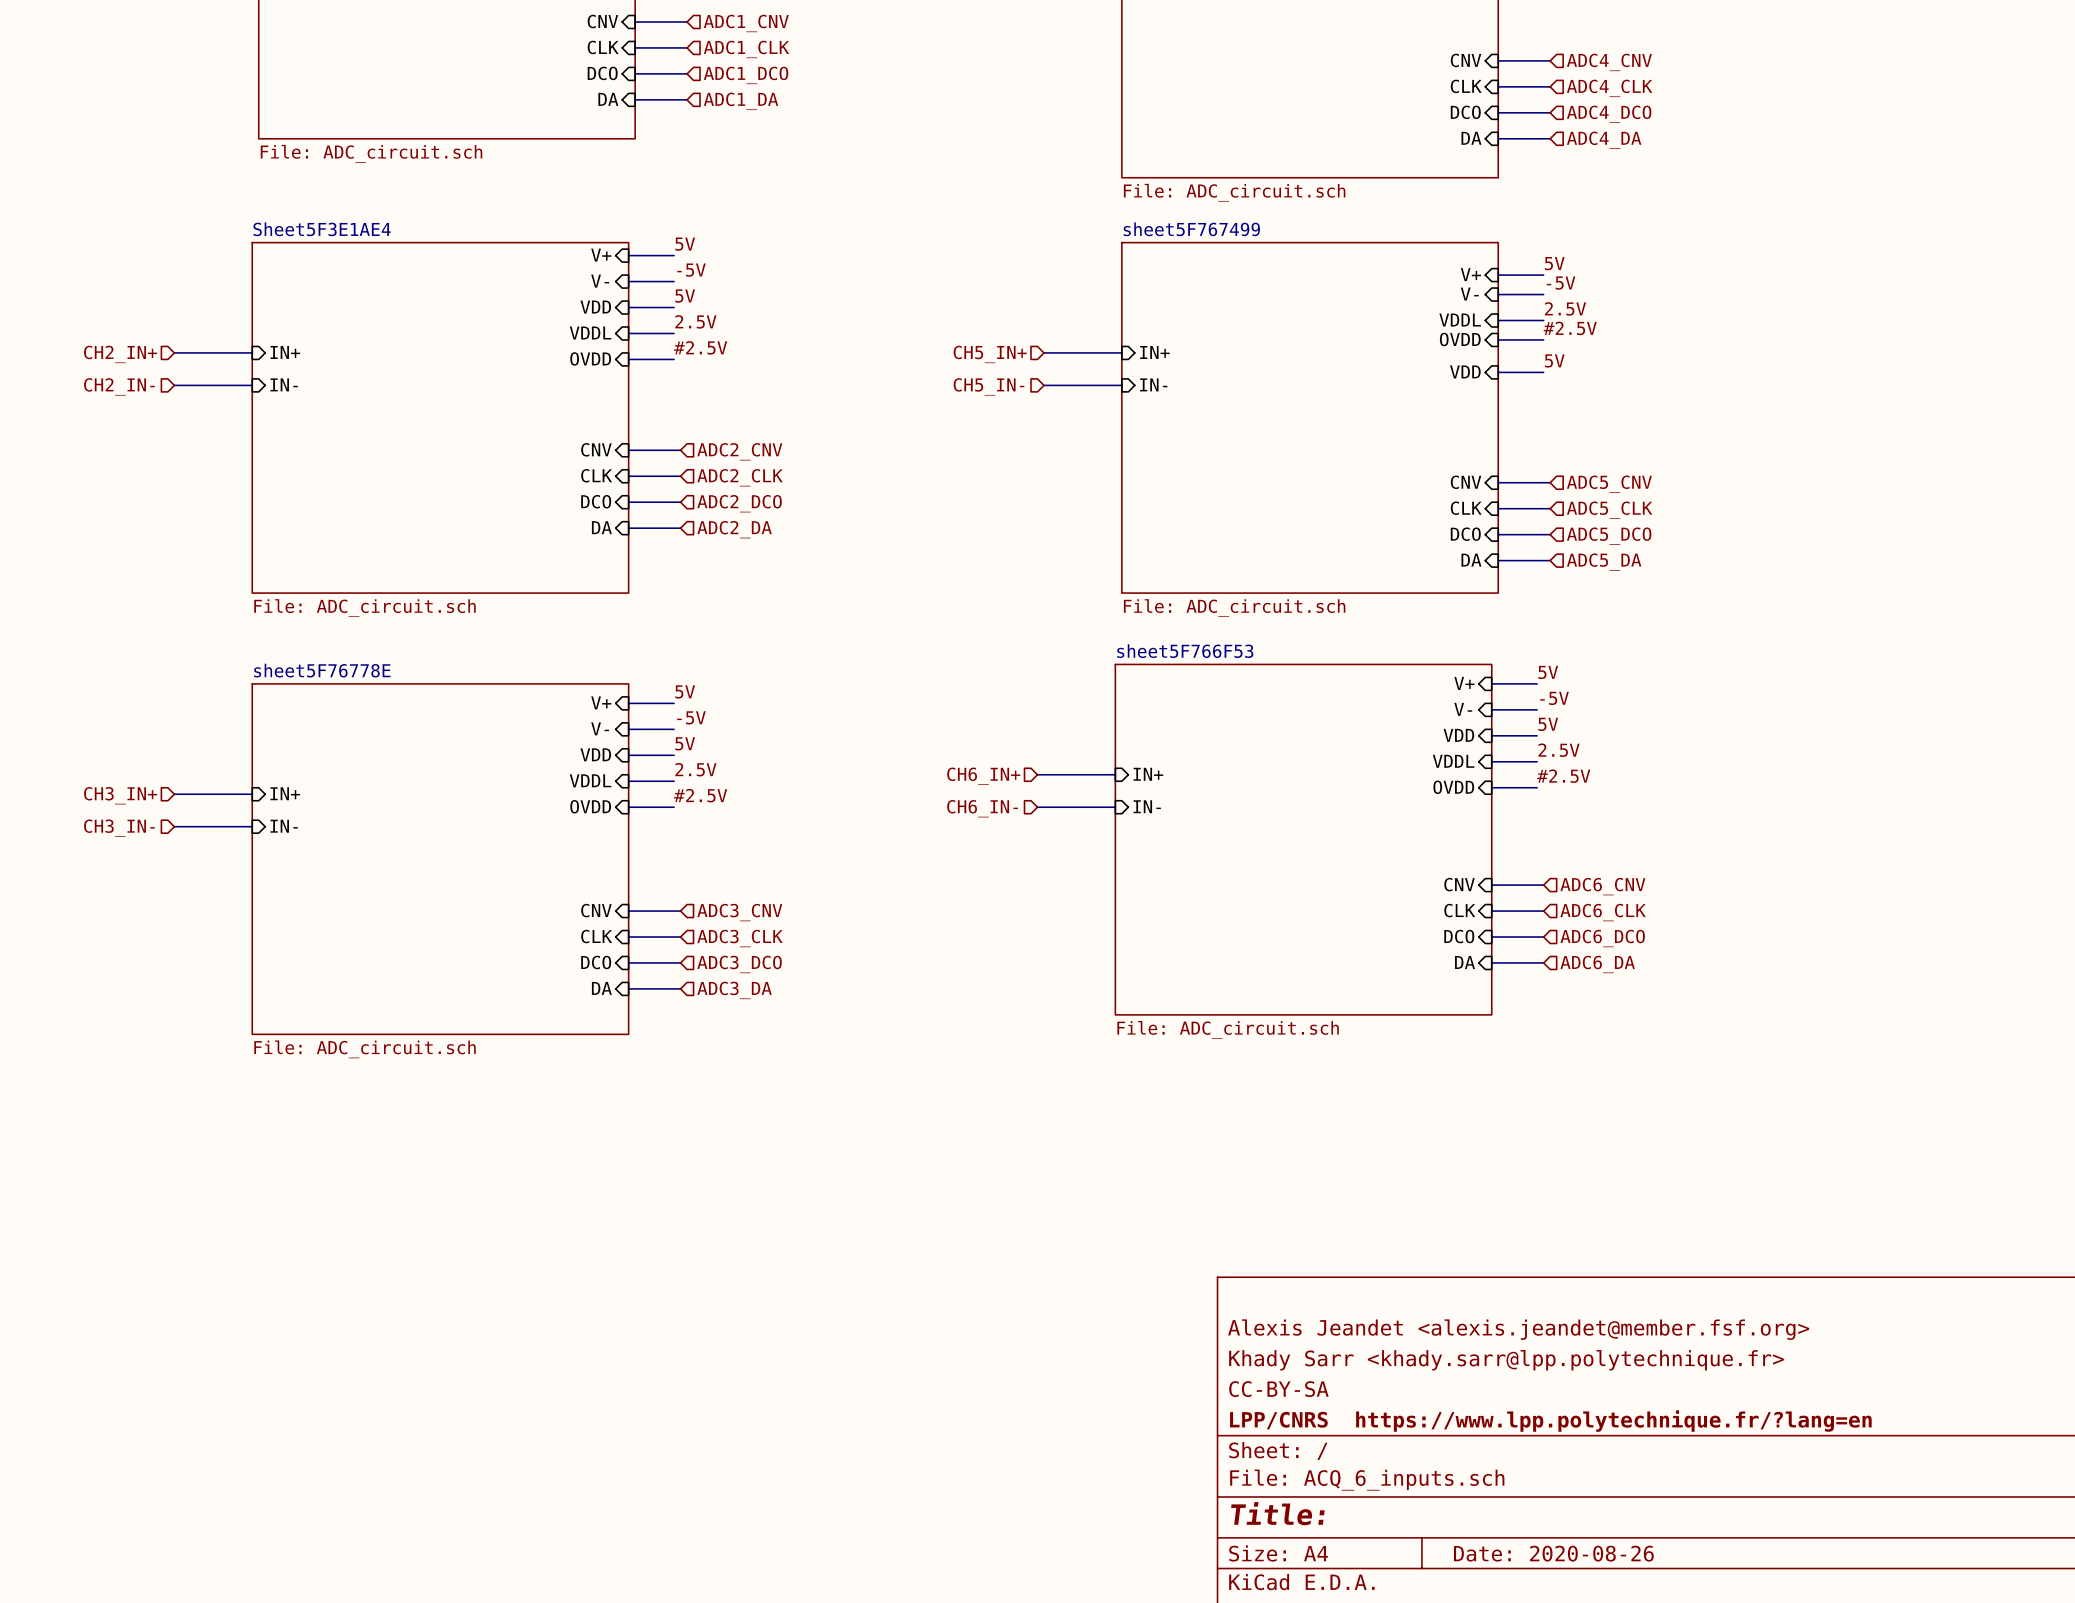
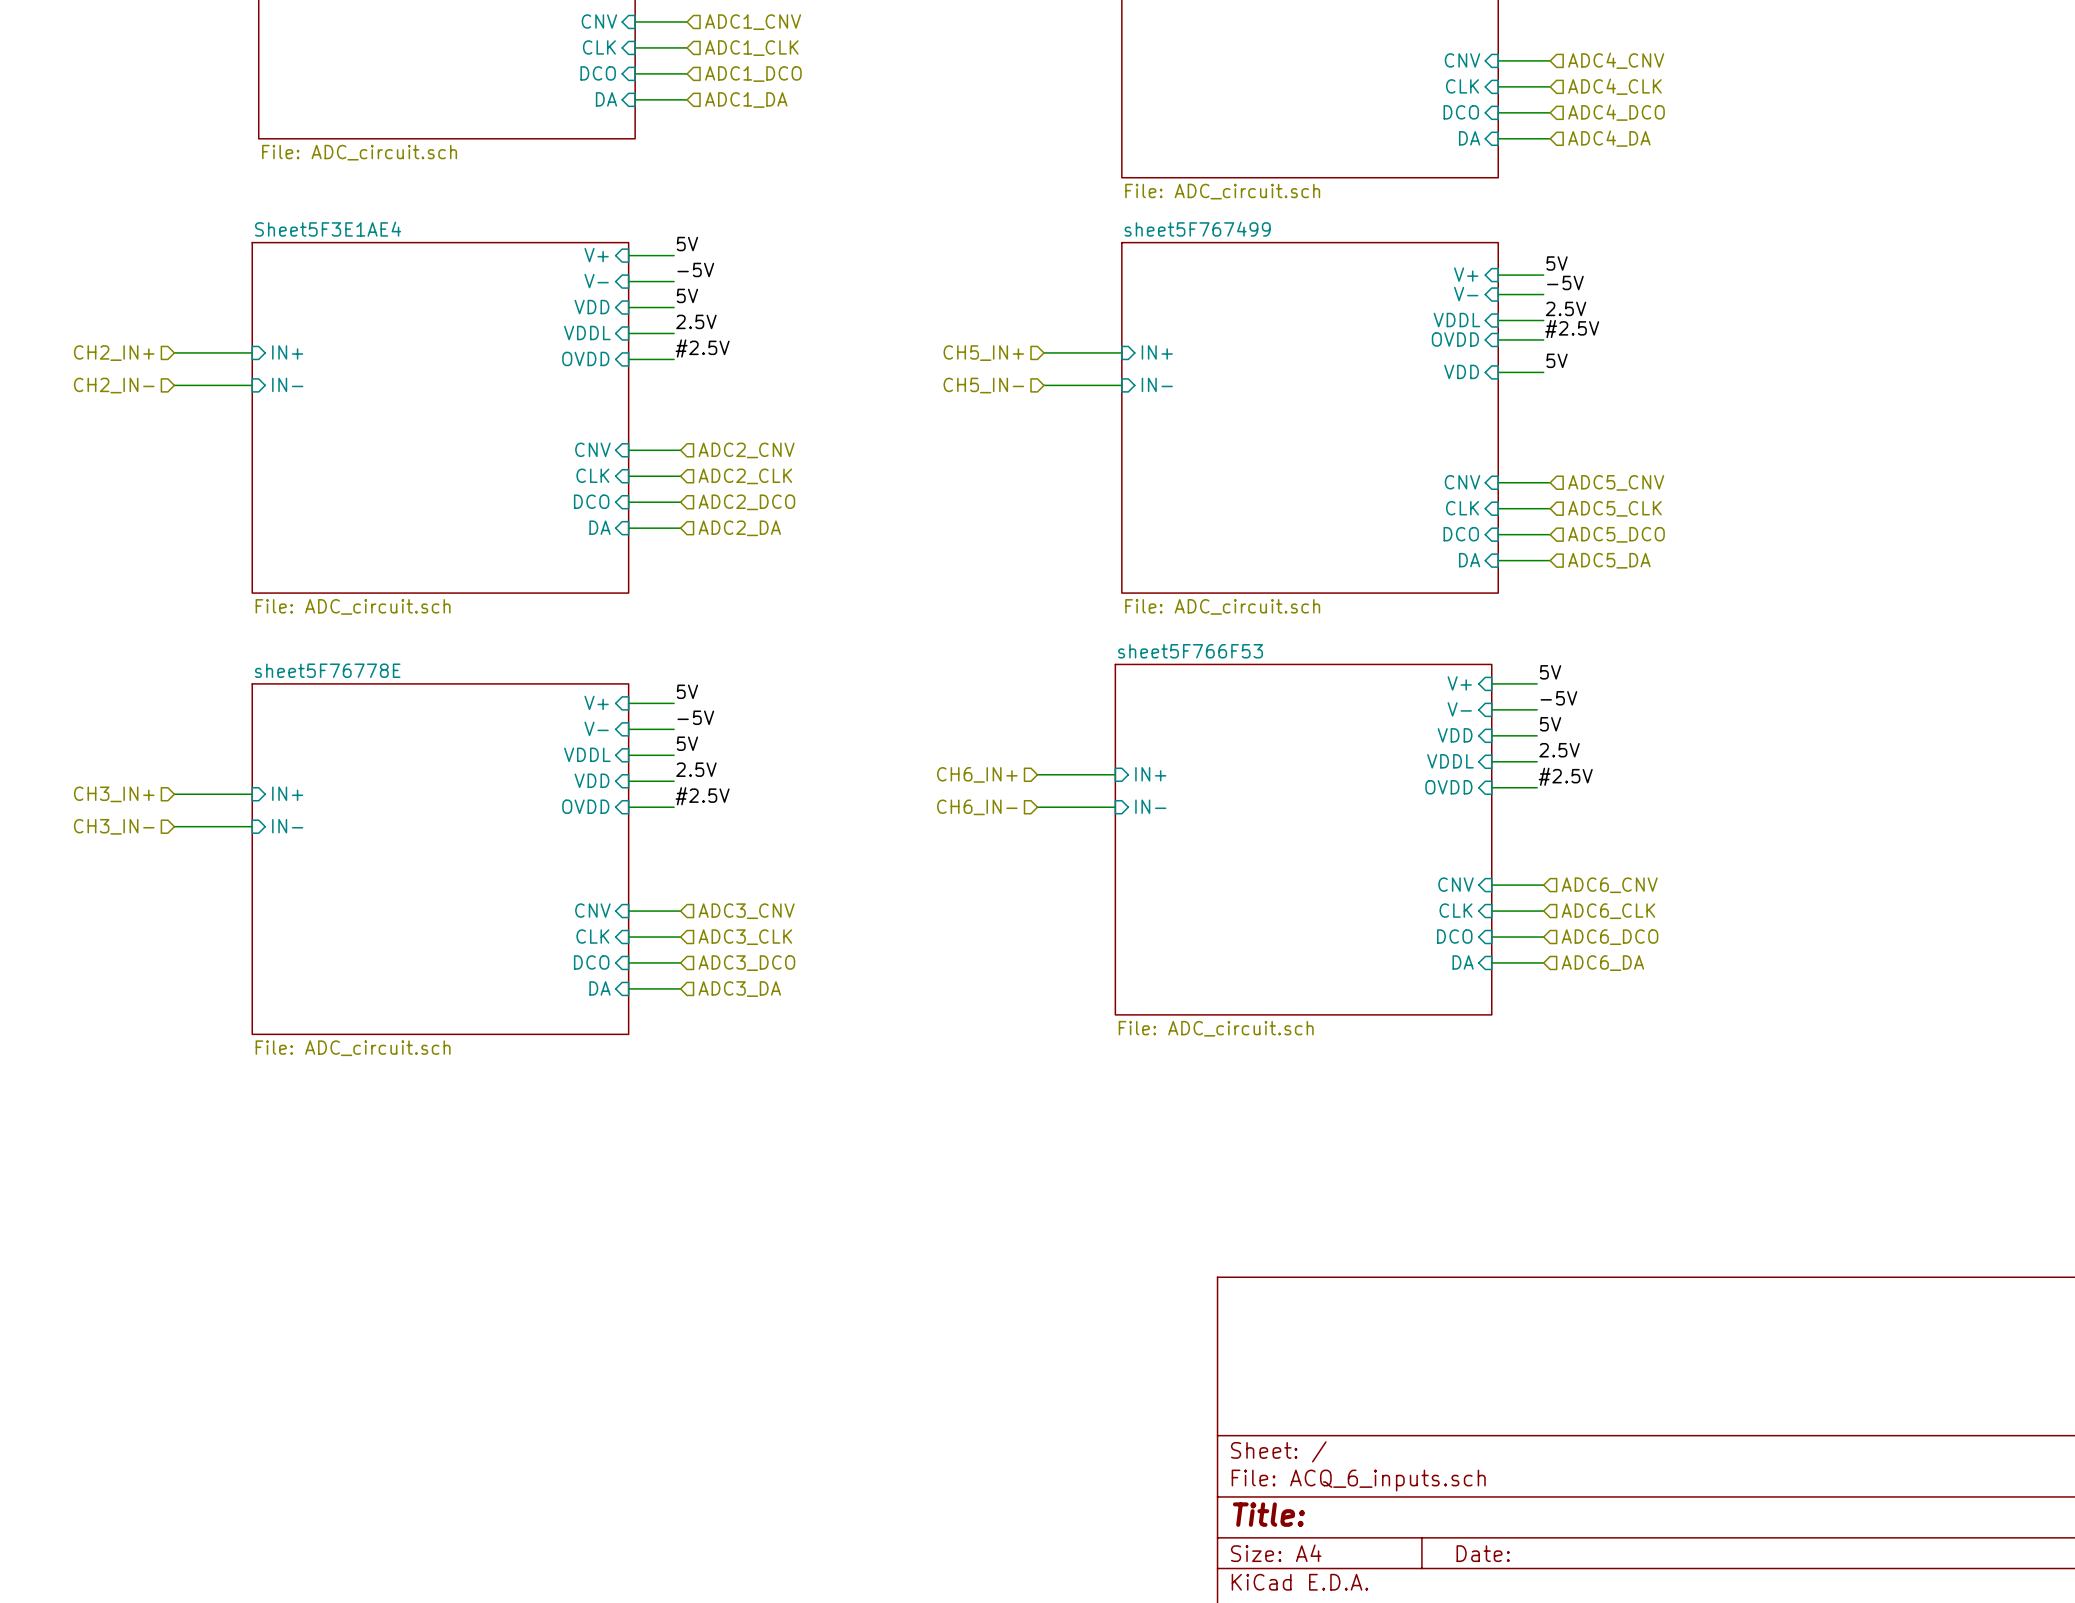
sheet pin: VDD (595, 754) -> VDDL (587, 754)
sheet pin: VDDL (590, 780) -> VDD (591, 780)
title block: Alexis Jeandet <alexis.jeandet@member.fsf.org> (1518, 1329) -> none
title block: Khady Sarr <khady.sarr@lpp.polytechnique.fr> (1506, 1360) -> none
title block: CC-BY-SA (1278, 1389) -> none
title block: LPP/CNRS https://www.lpp.polytechnique.fr/?lang=en (1550, 1421) -> none
title block: Date: 2020-08-26 (1553, 1553) -> Date: (1483, 1553)

